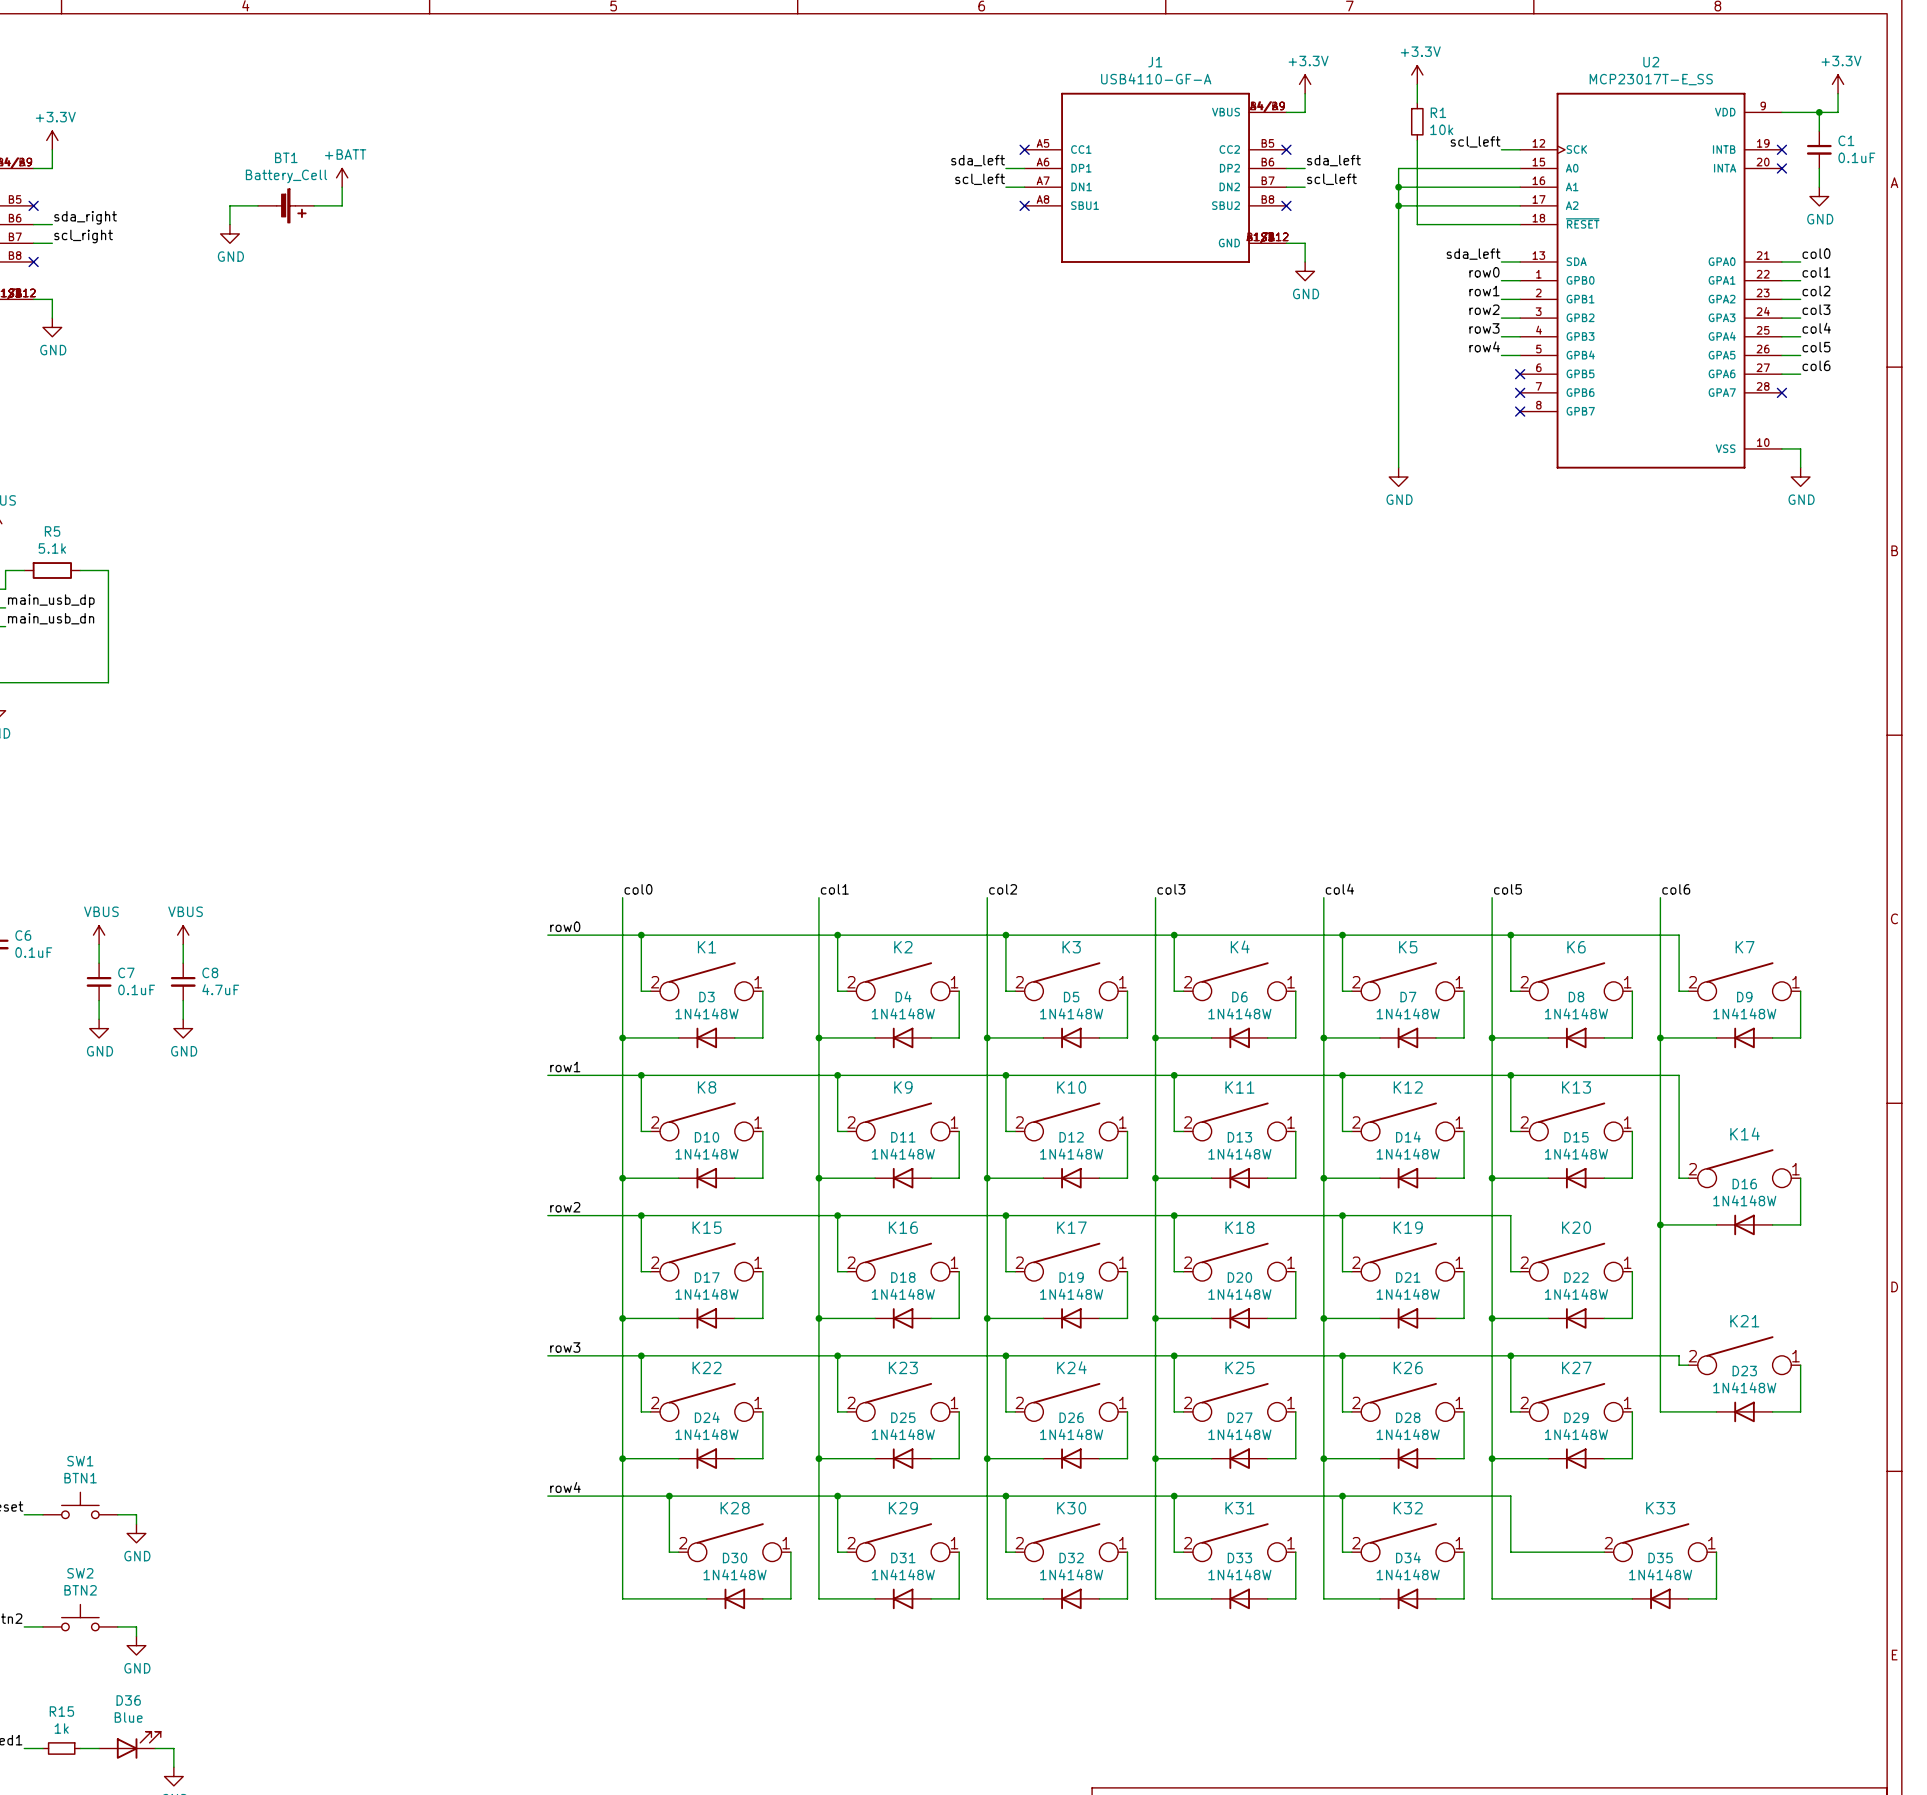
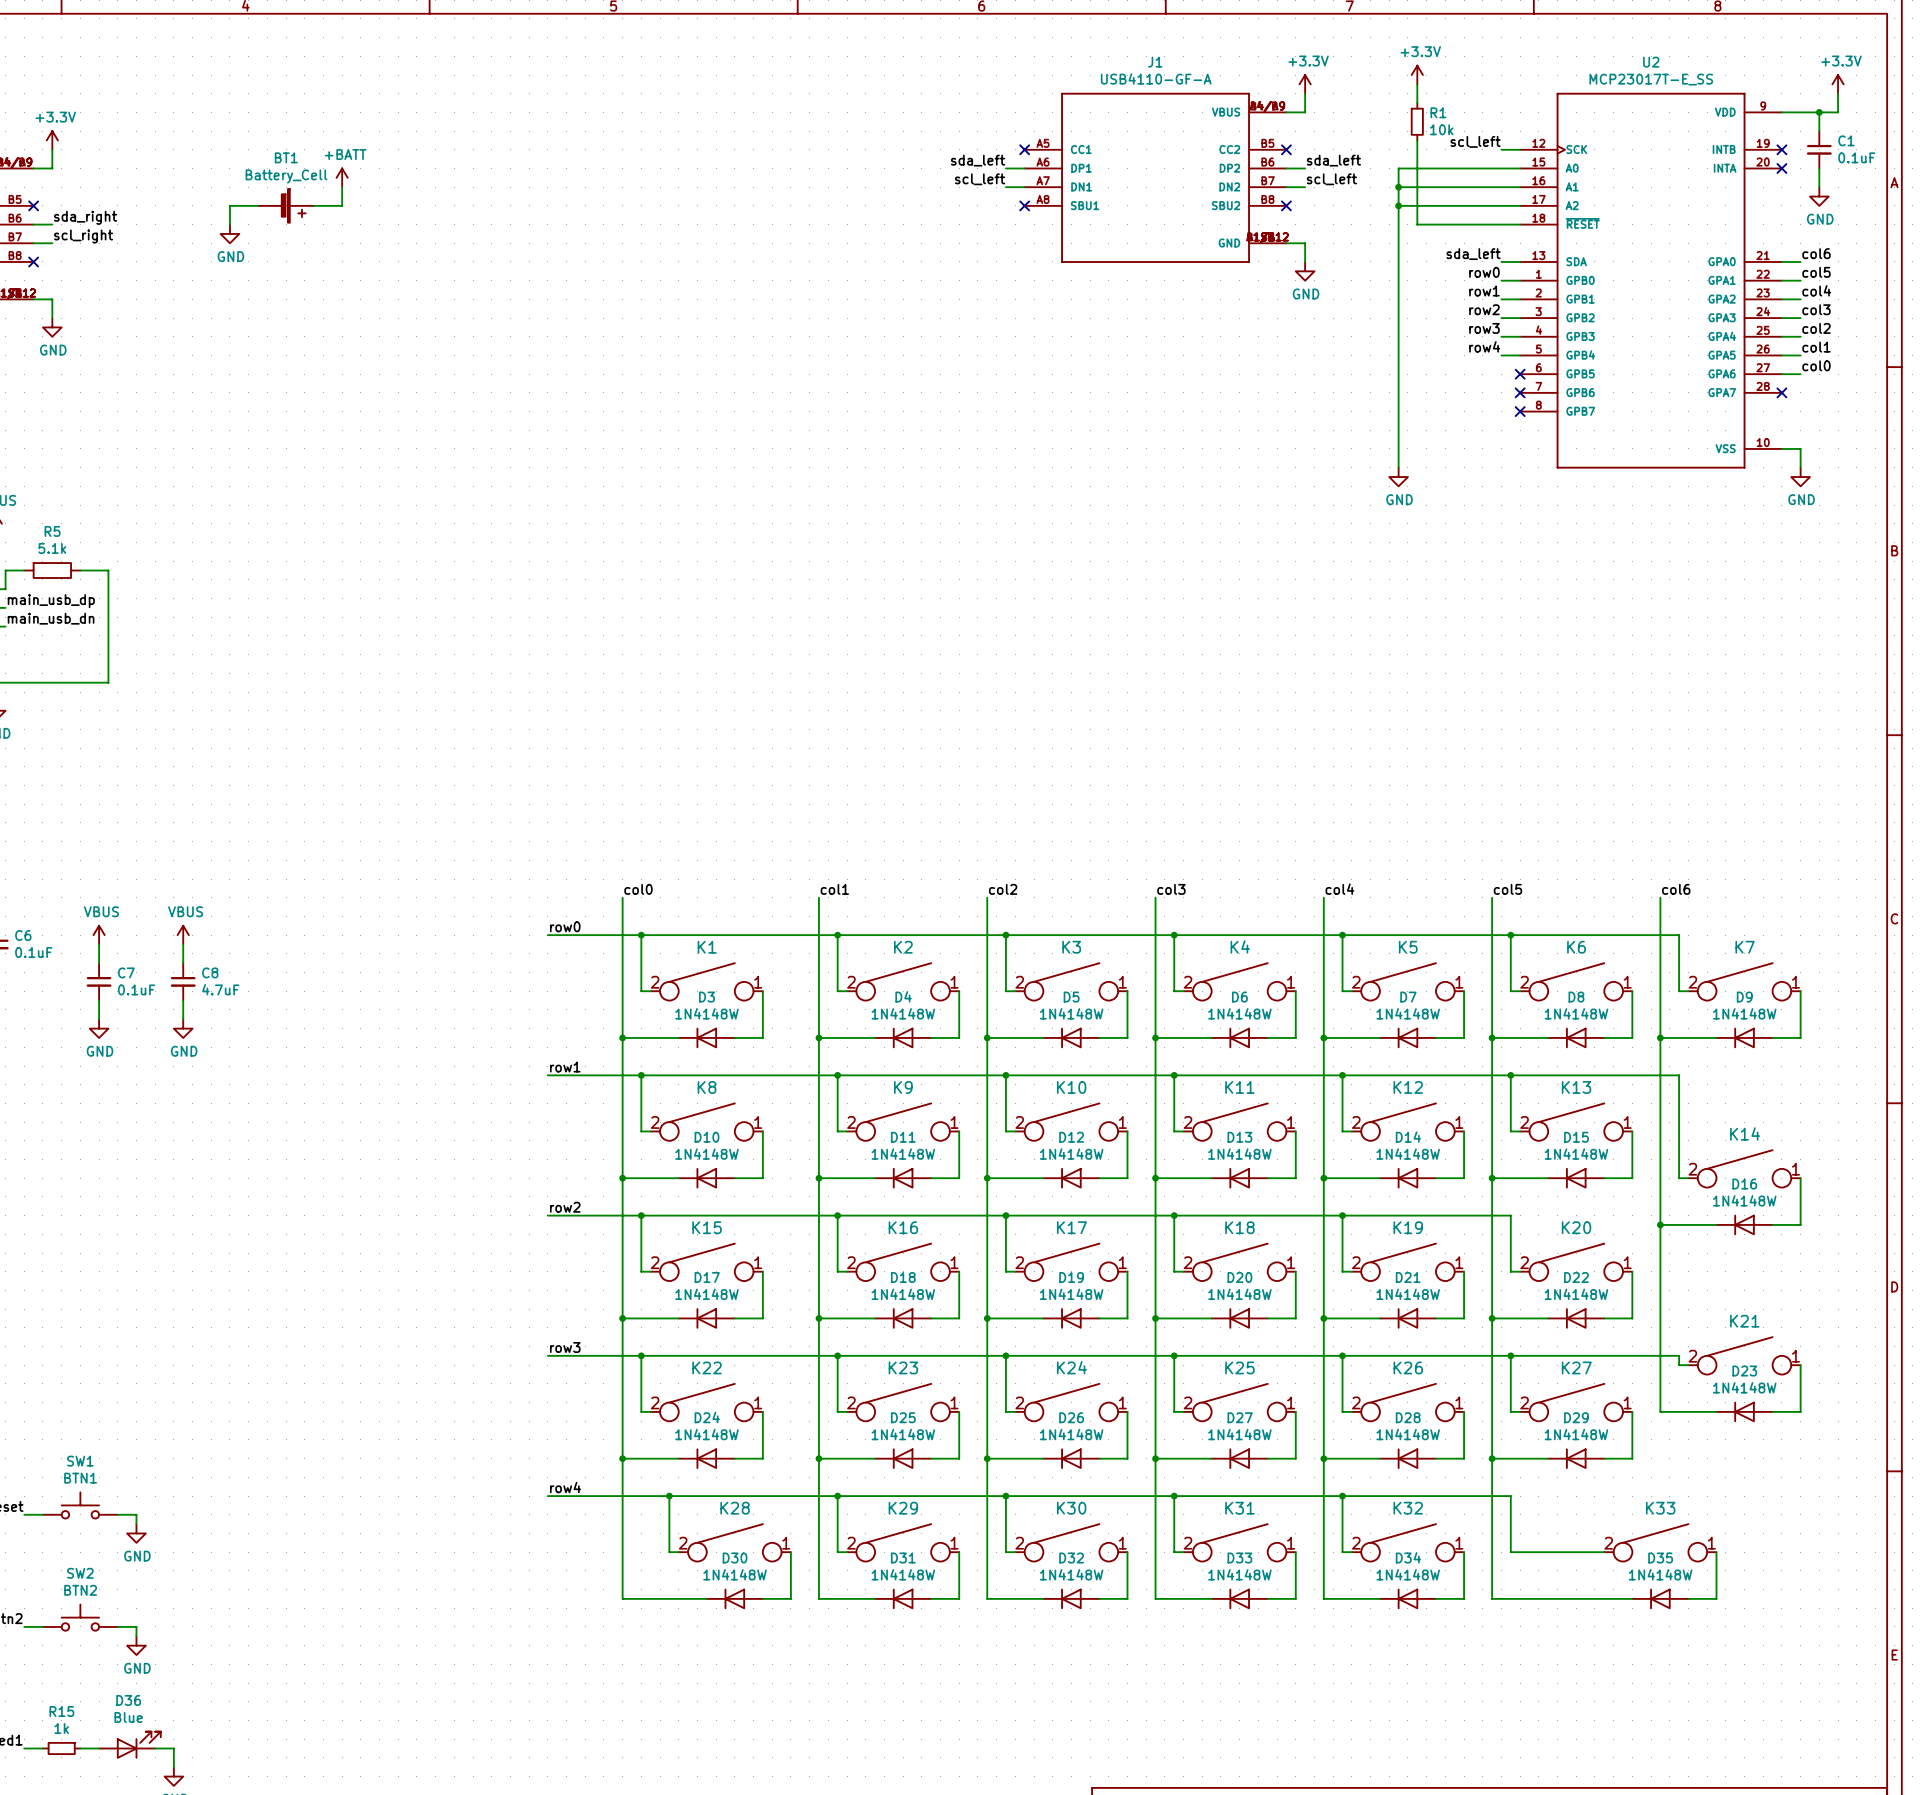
label: col0 (1816, 253) -> col6 (1816, 253)
label: col1 (1816, 272) -> col5 (1816, 272)
label: col2 (1816, 291) -> col4 (1816, 290)
label: col4 (1816, 328) -> col2 (1816, 328)
label: col5 (1816, 347) -> col1 (1816, 347)
label: col6 (1816, 365) -> col0 (1816, 365)

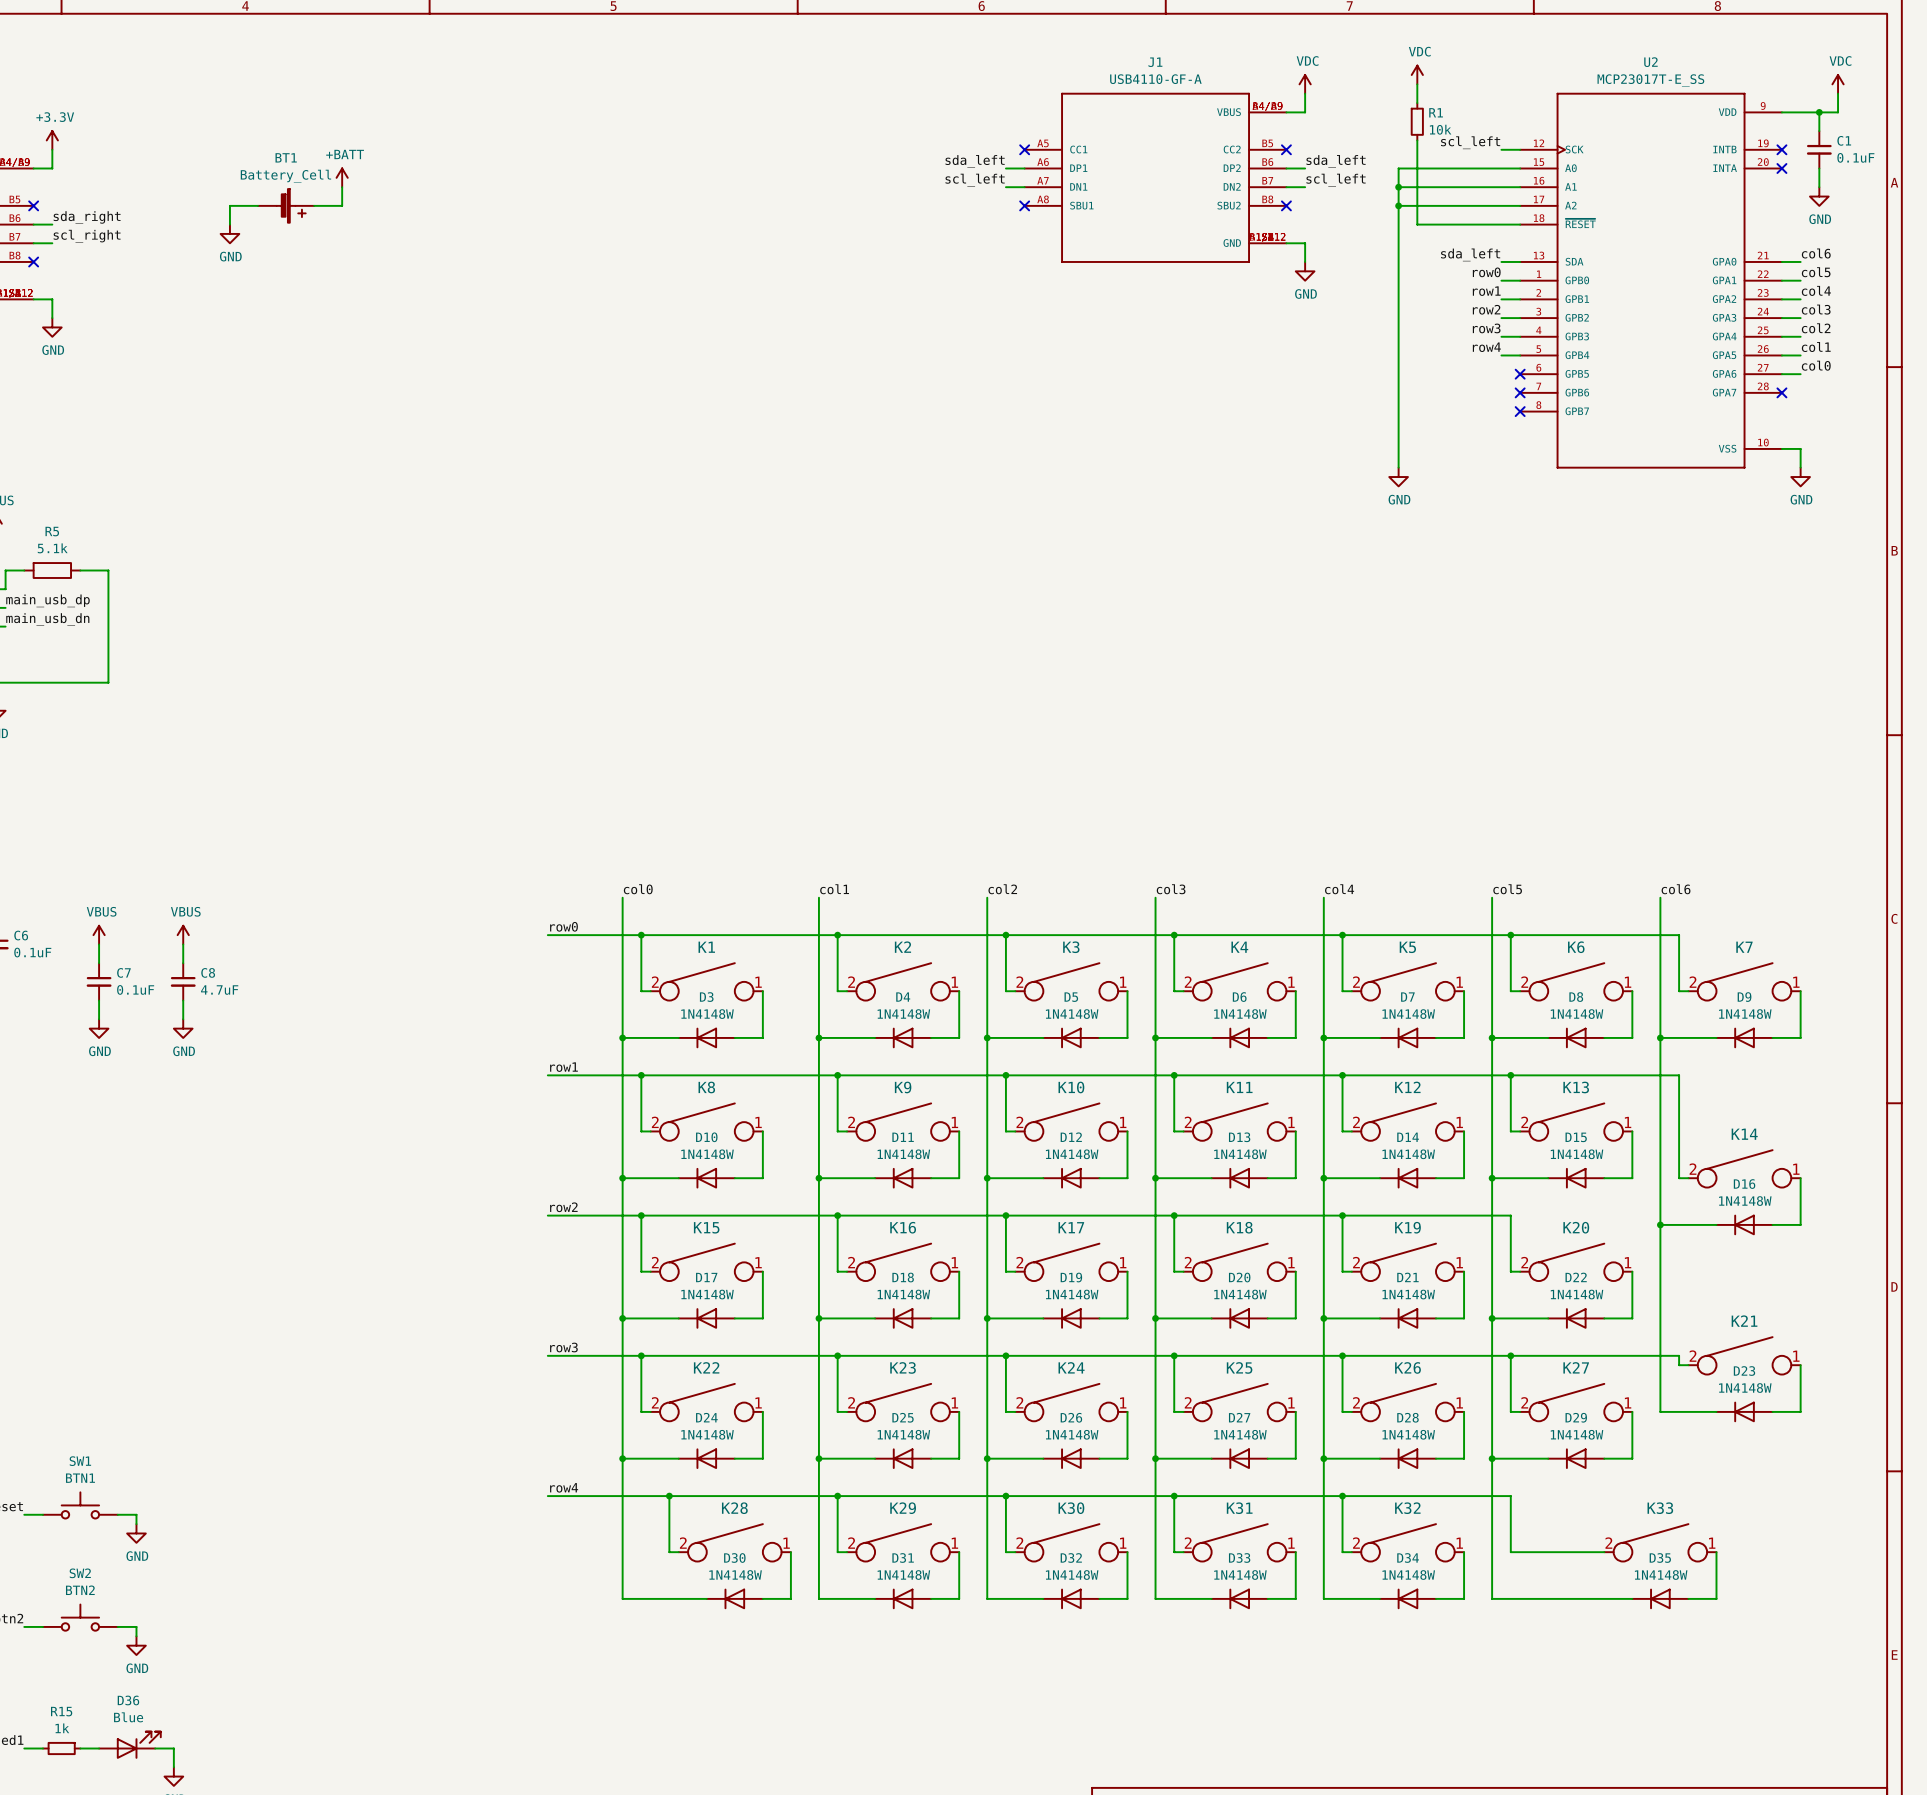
power symbol: +3.3V (1417, 75) -> VDC (1417, 75)
power symbol: +3.3V (1305, 84) -> VDC (1305, 84)
power symbol: +3.3V (1838, 84) -> VDC (1838, 84)

